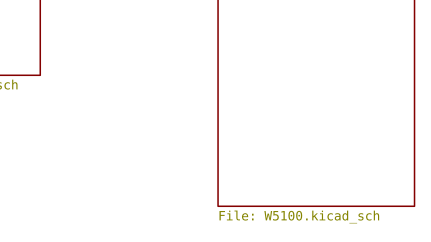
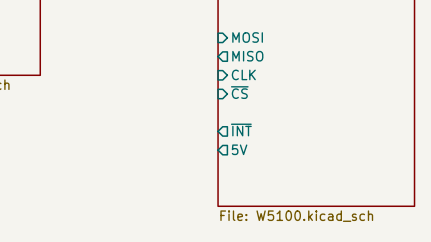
sheet pin: none -> MOSI (247, 37)
sheet pin: none -> MISO (247, 56)
sheet pin: none -> CLK (243, 74)
sheet pin: none -> ~{CS} (239, 92)
sheet pin: none -> ~{INT} (241, 130)
sheet pin: none -> 5V (239, 149)

